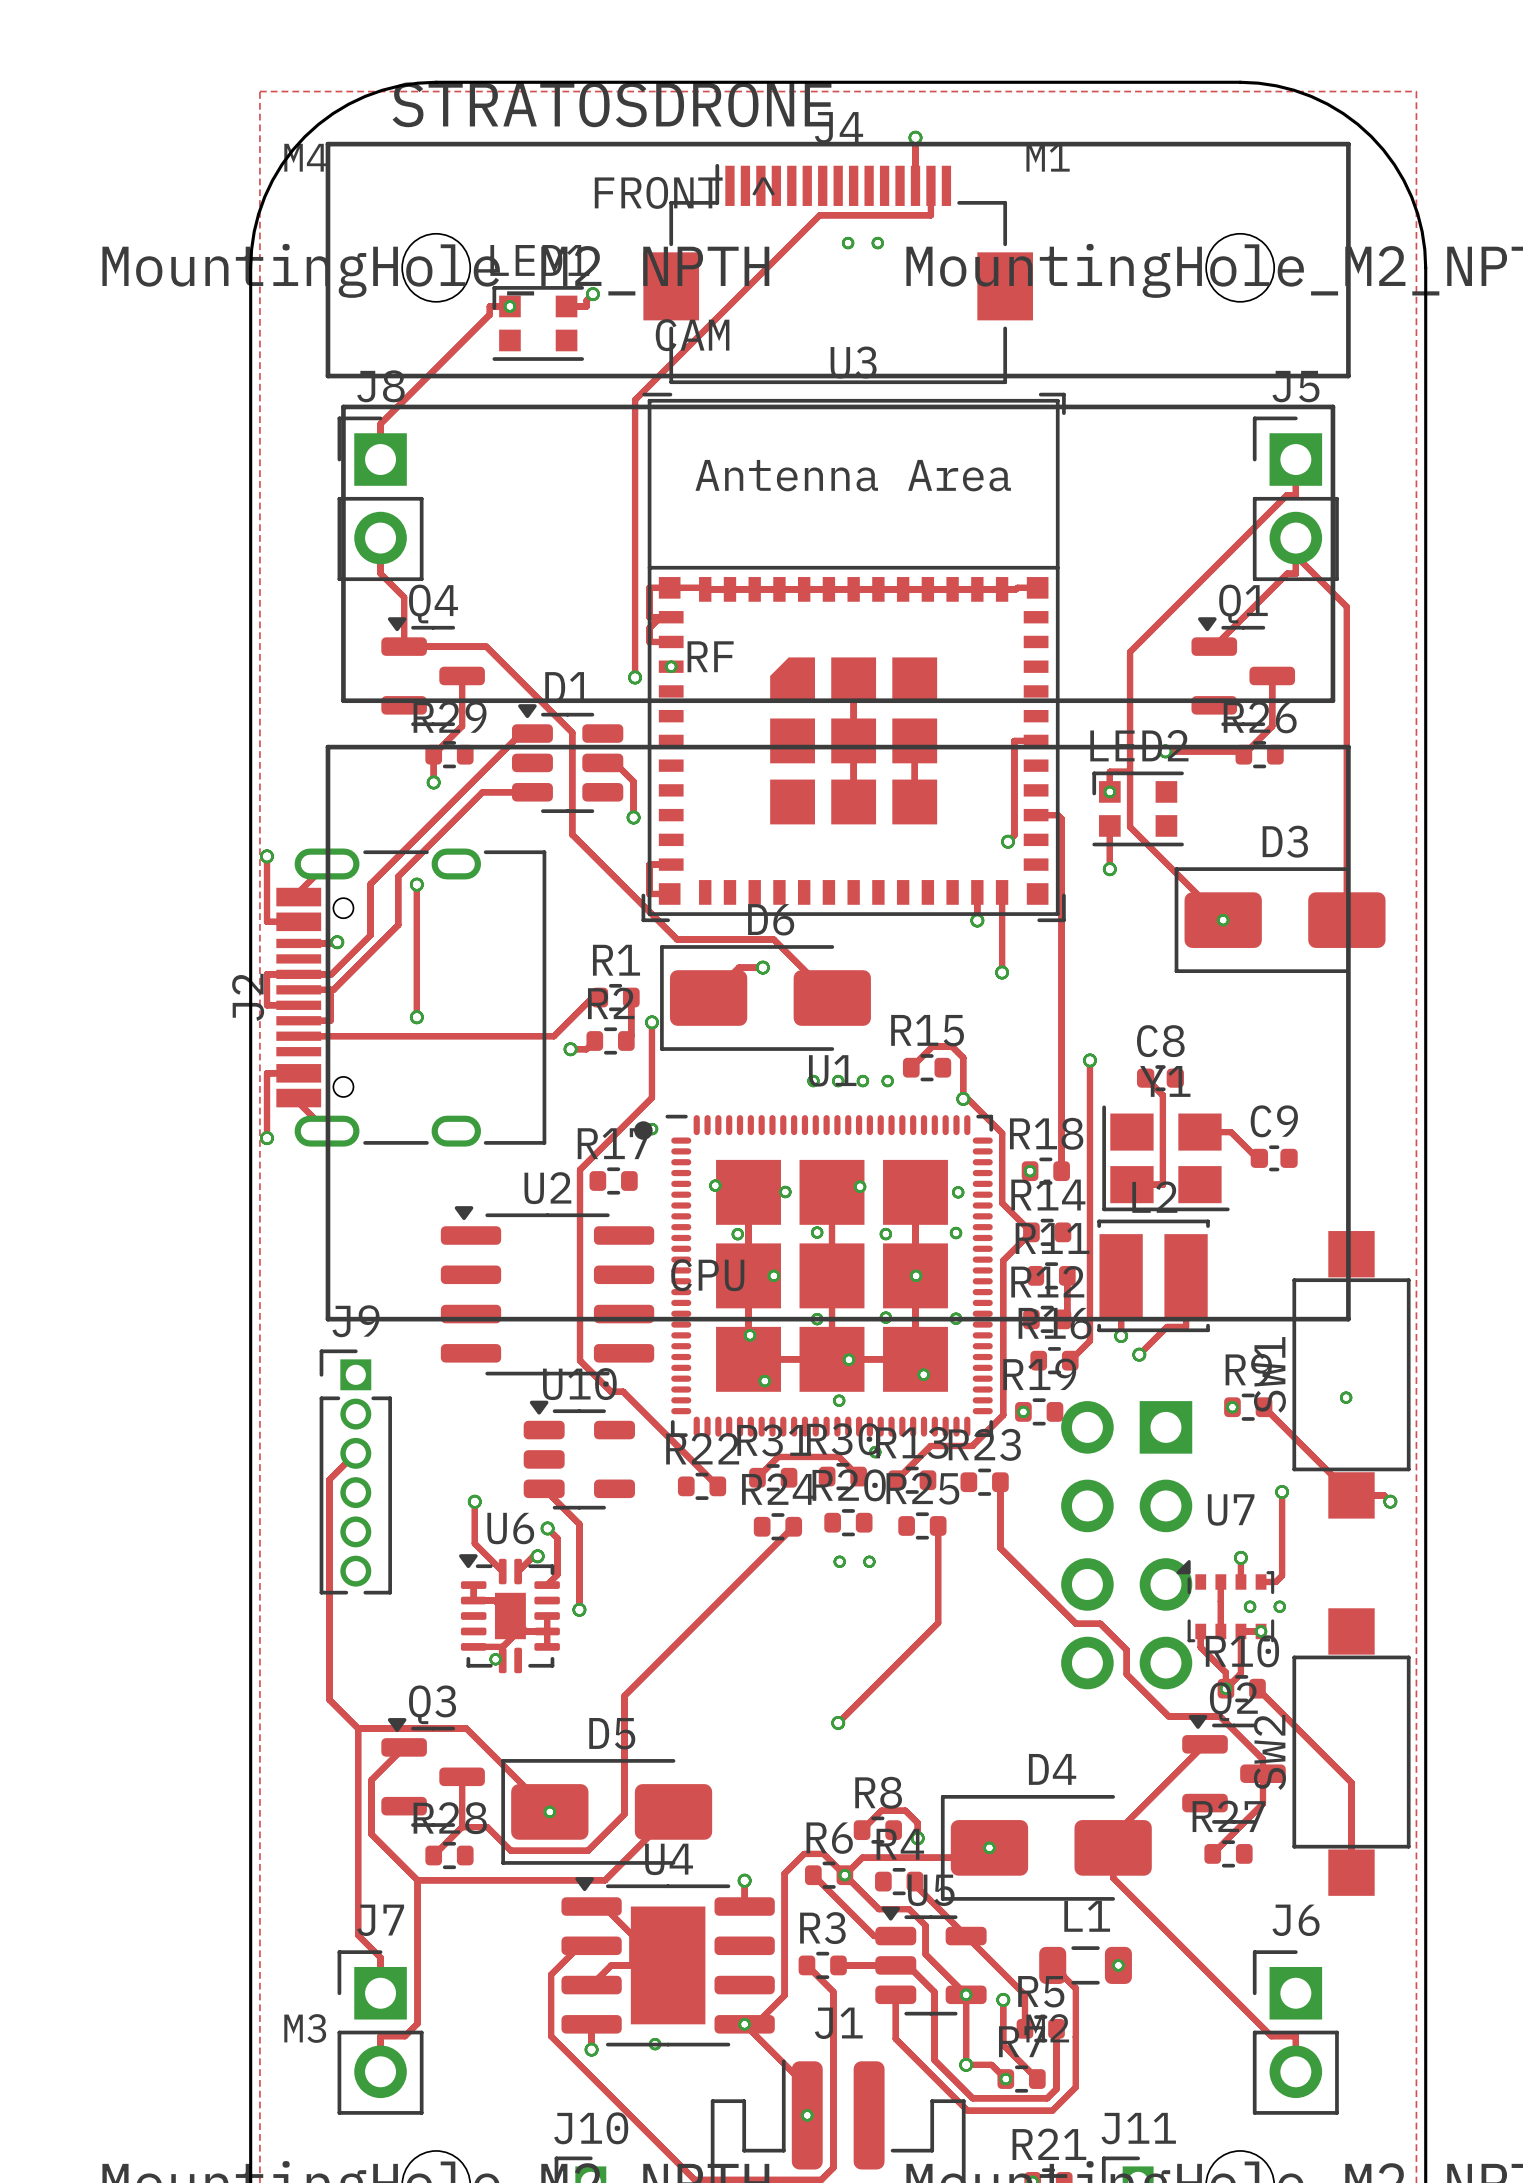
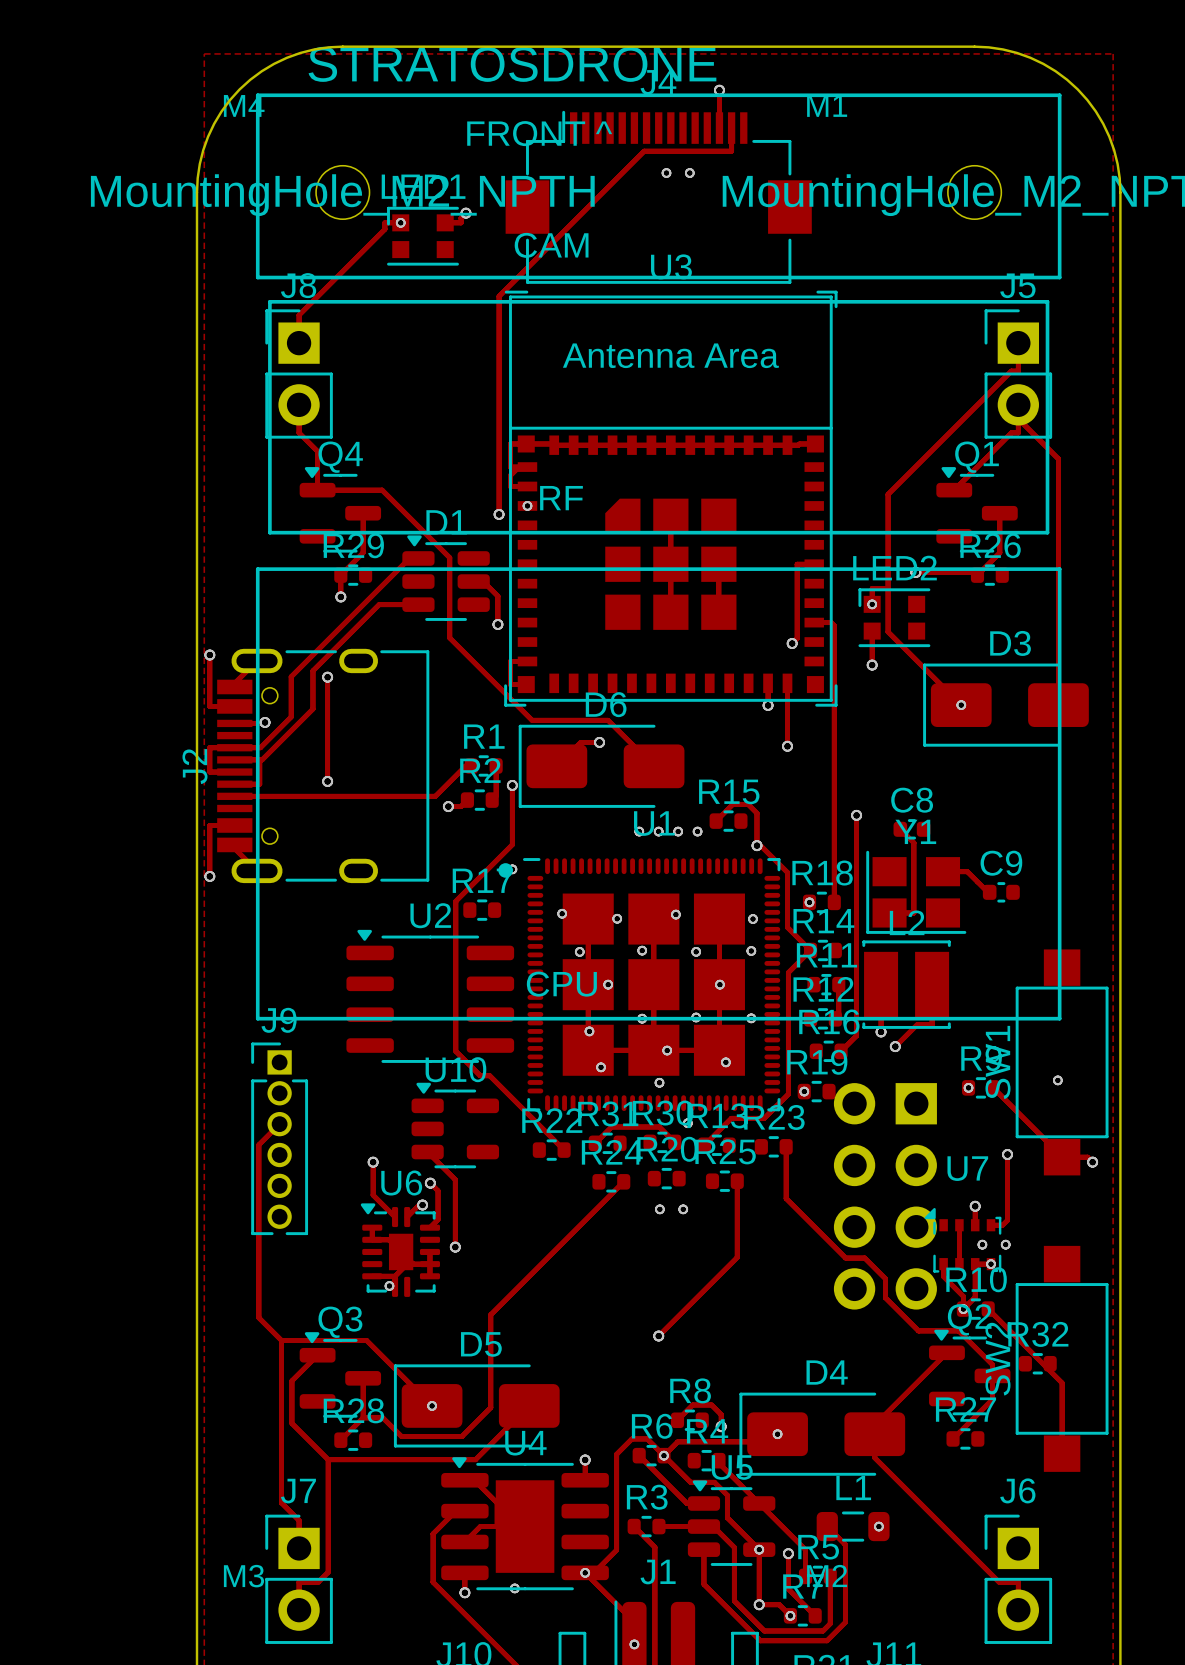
R32: none -> (1037, 1363)

